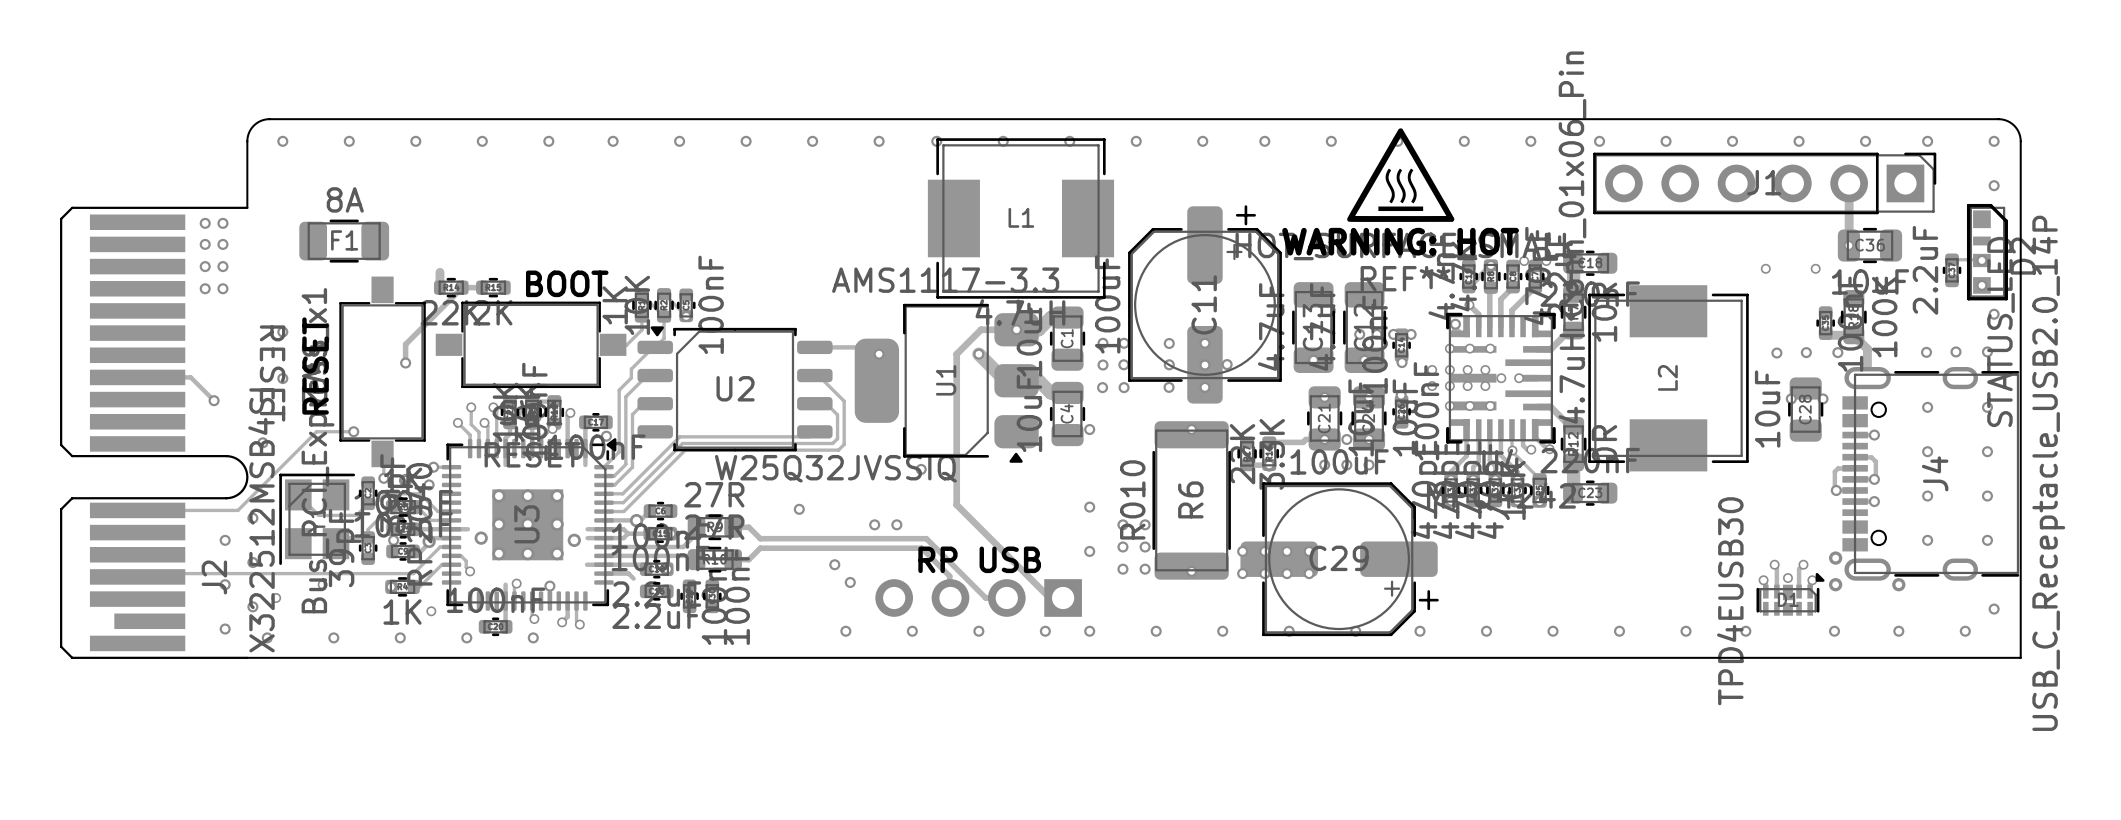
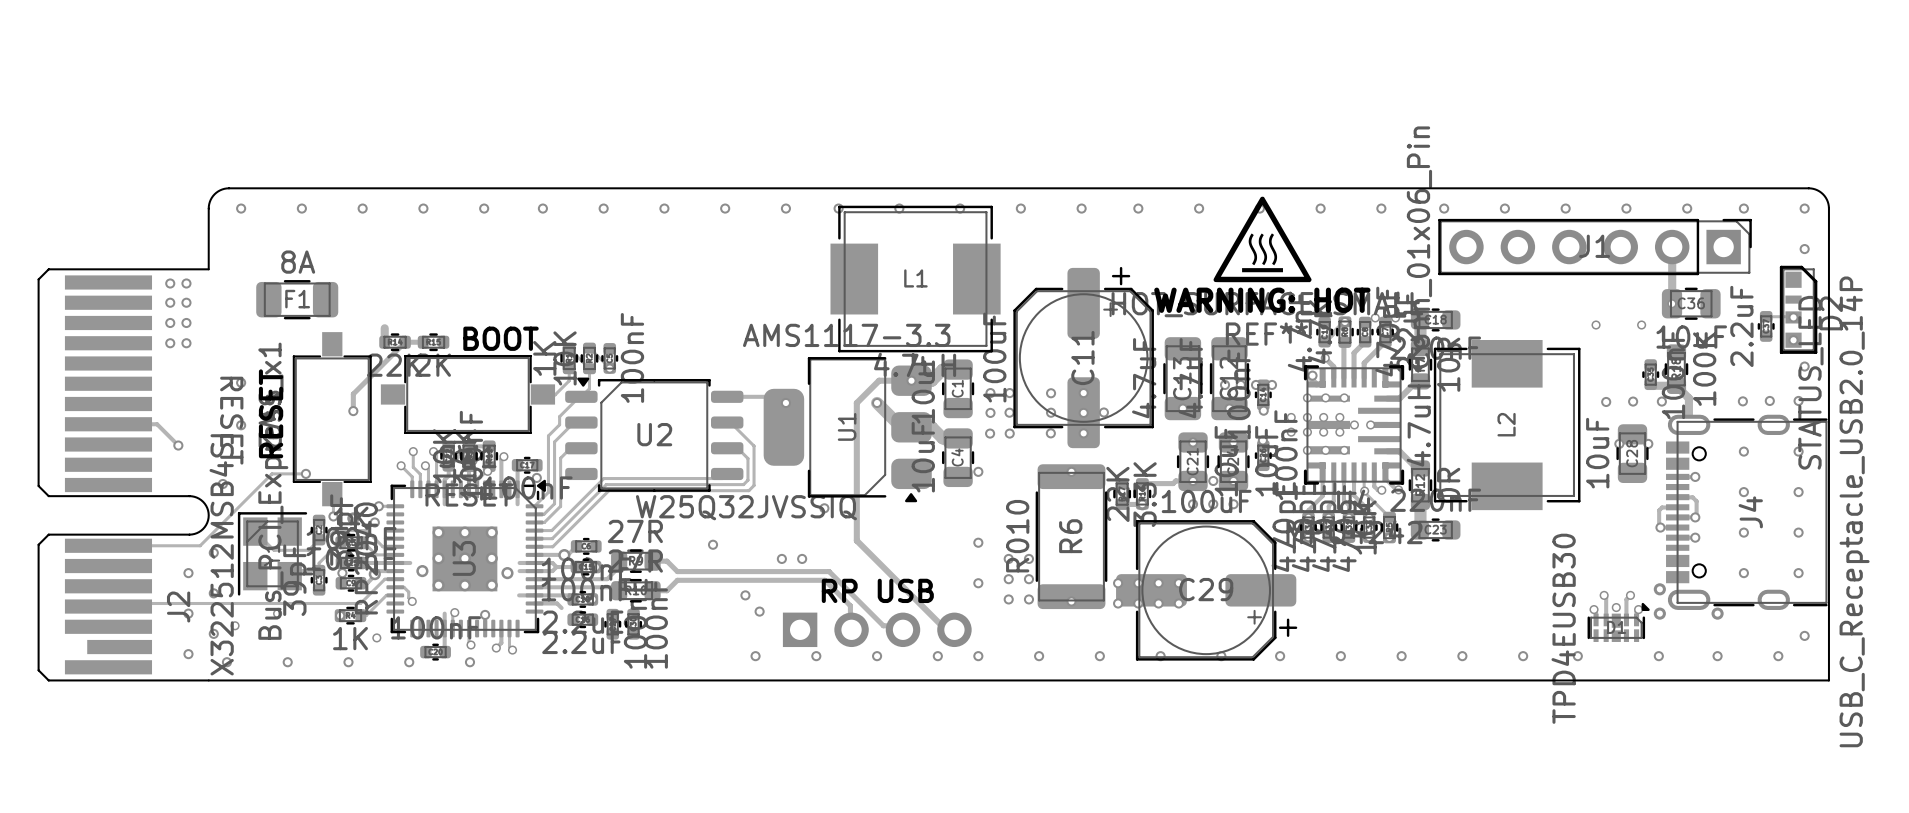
part rotation: 0° (978, 597) -> 180° (877, 629)

